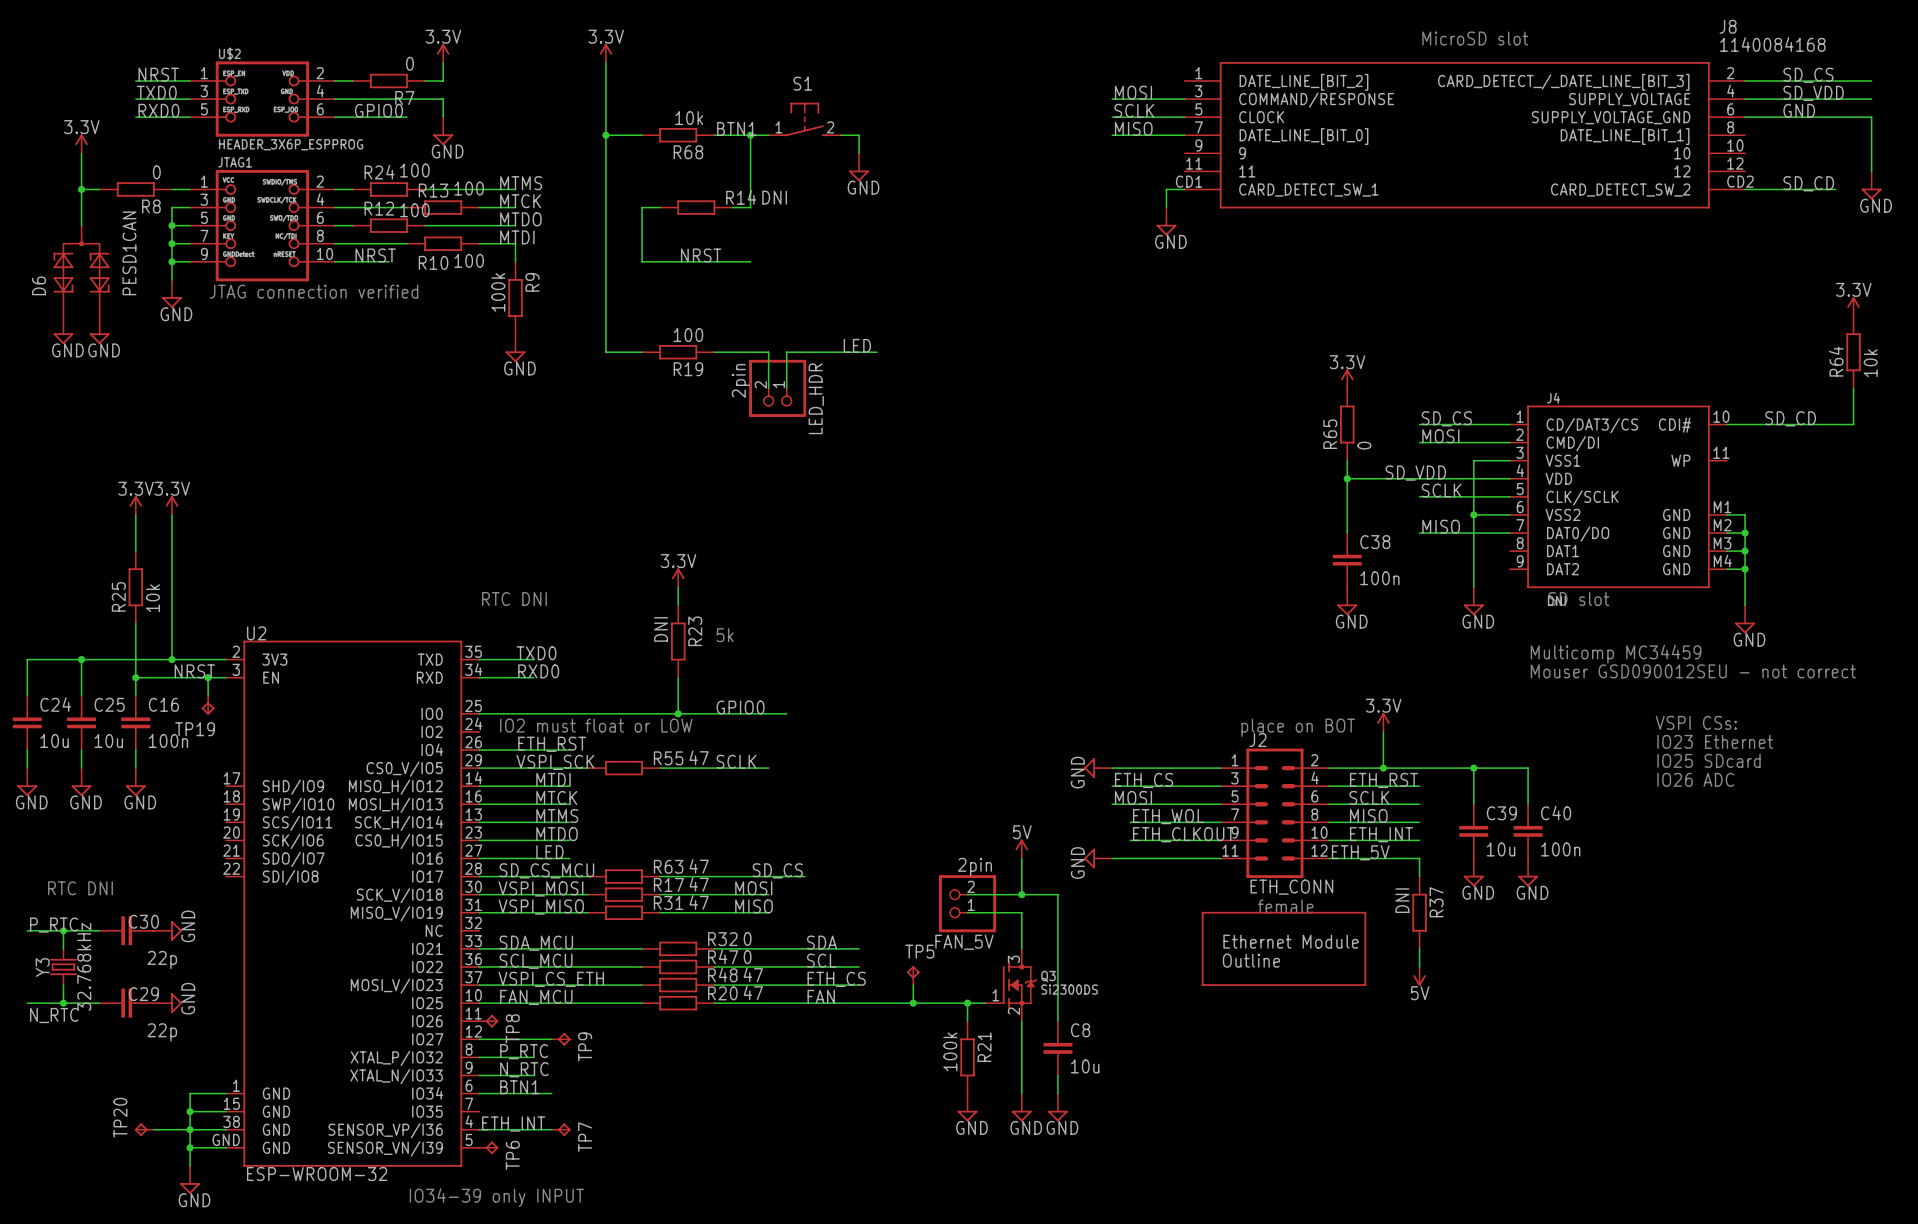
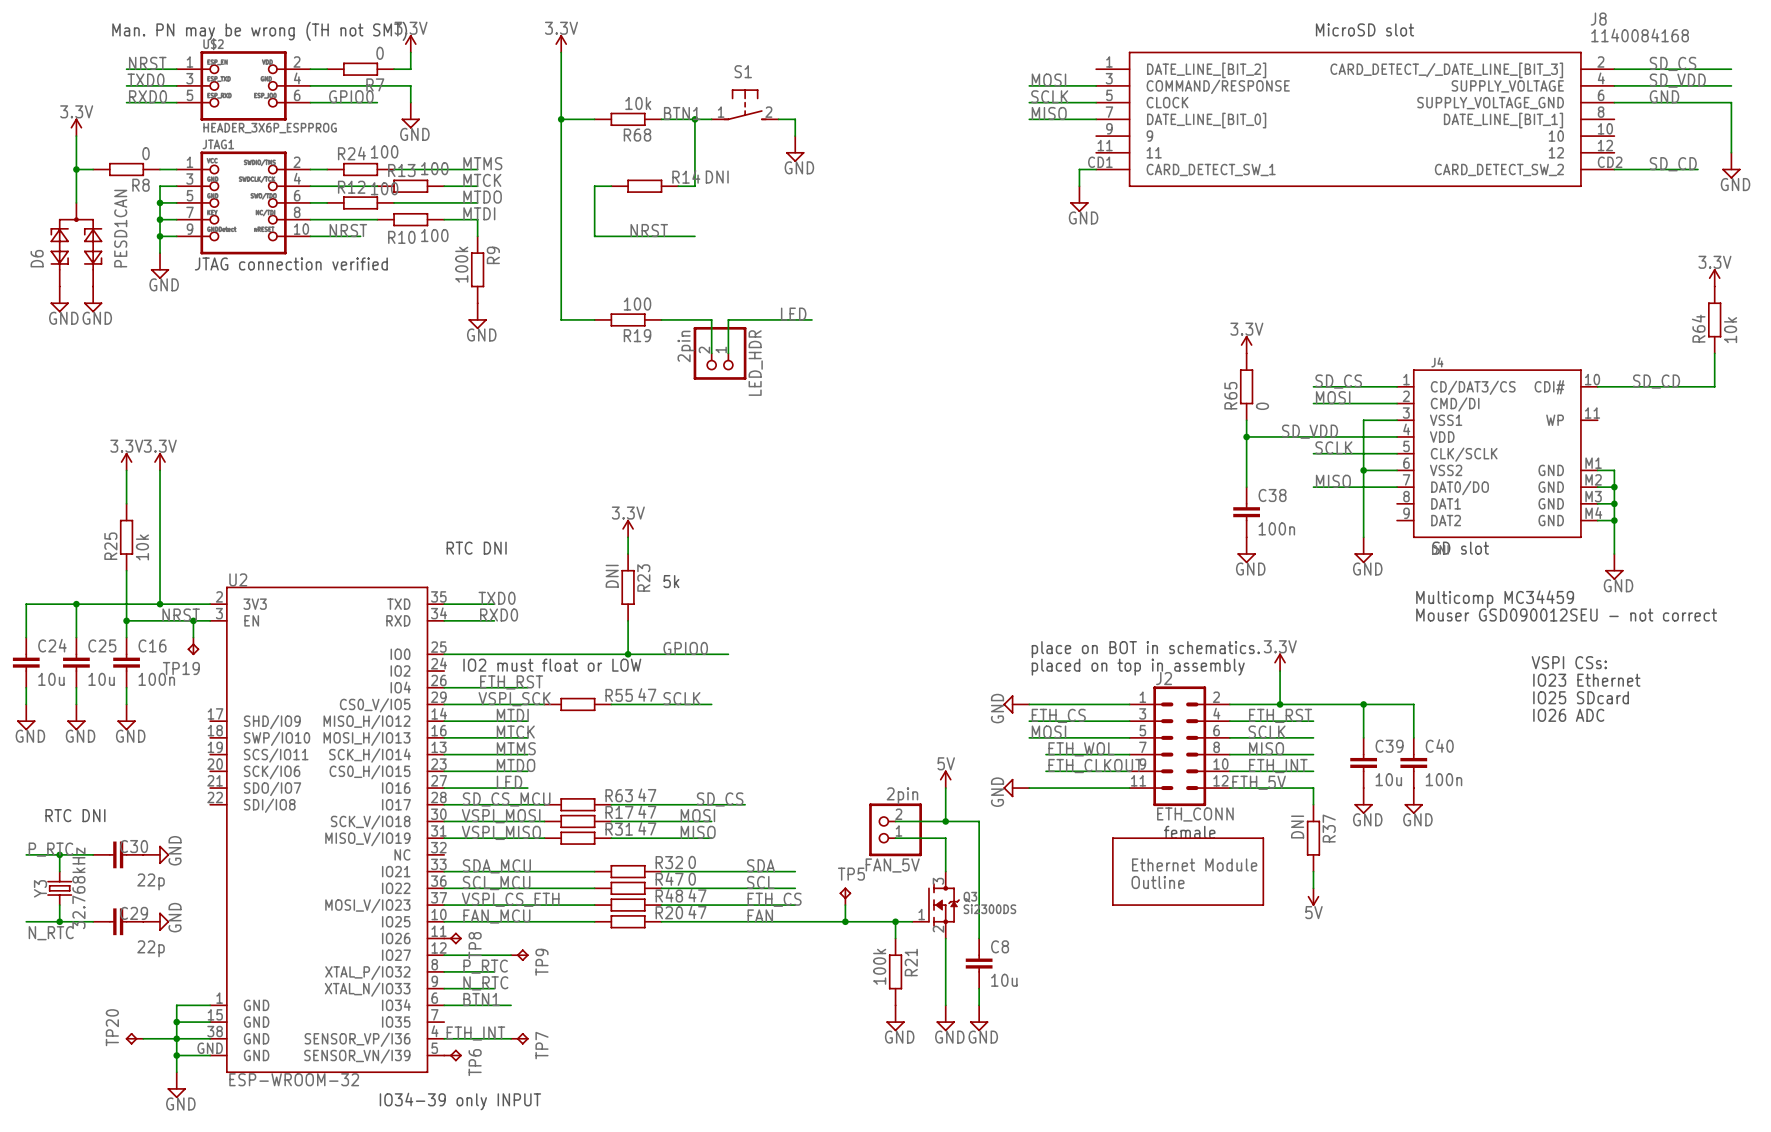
text: none -> Man. PN may be wrong (TH not SMT) (259, 31)
text: none -> placed on top in assembly (1138, 667)
text: place on BOT (1298, 727) -> place on BOT in schematics. (1145, 649)

